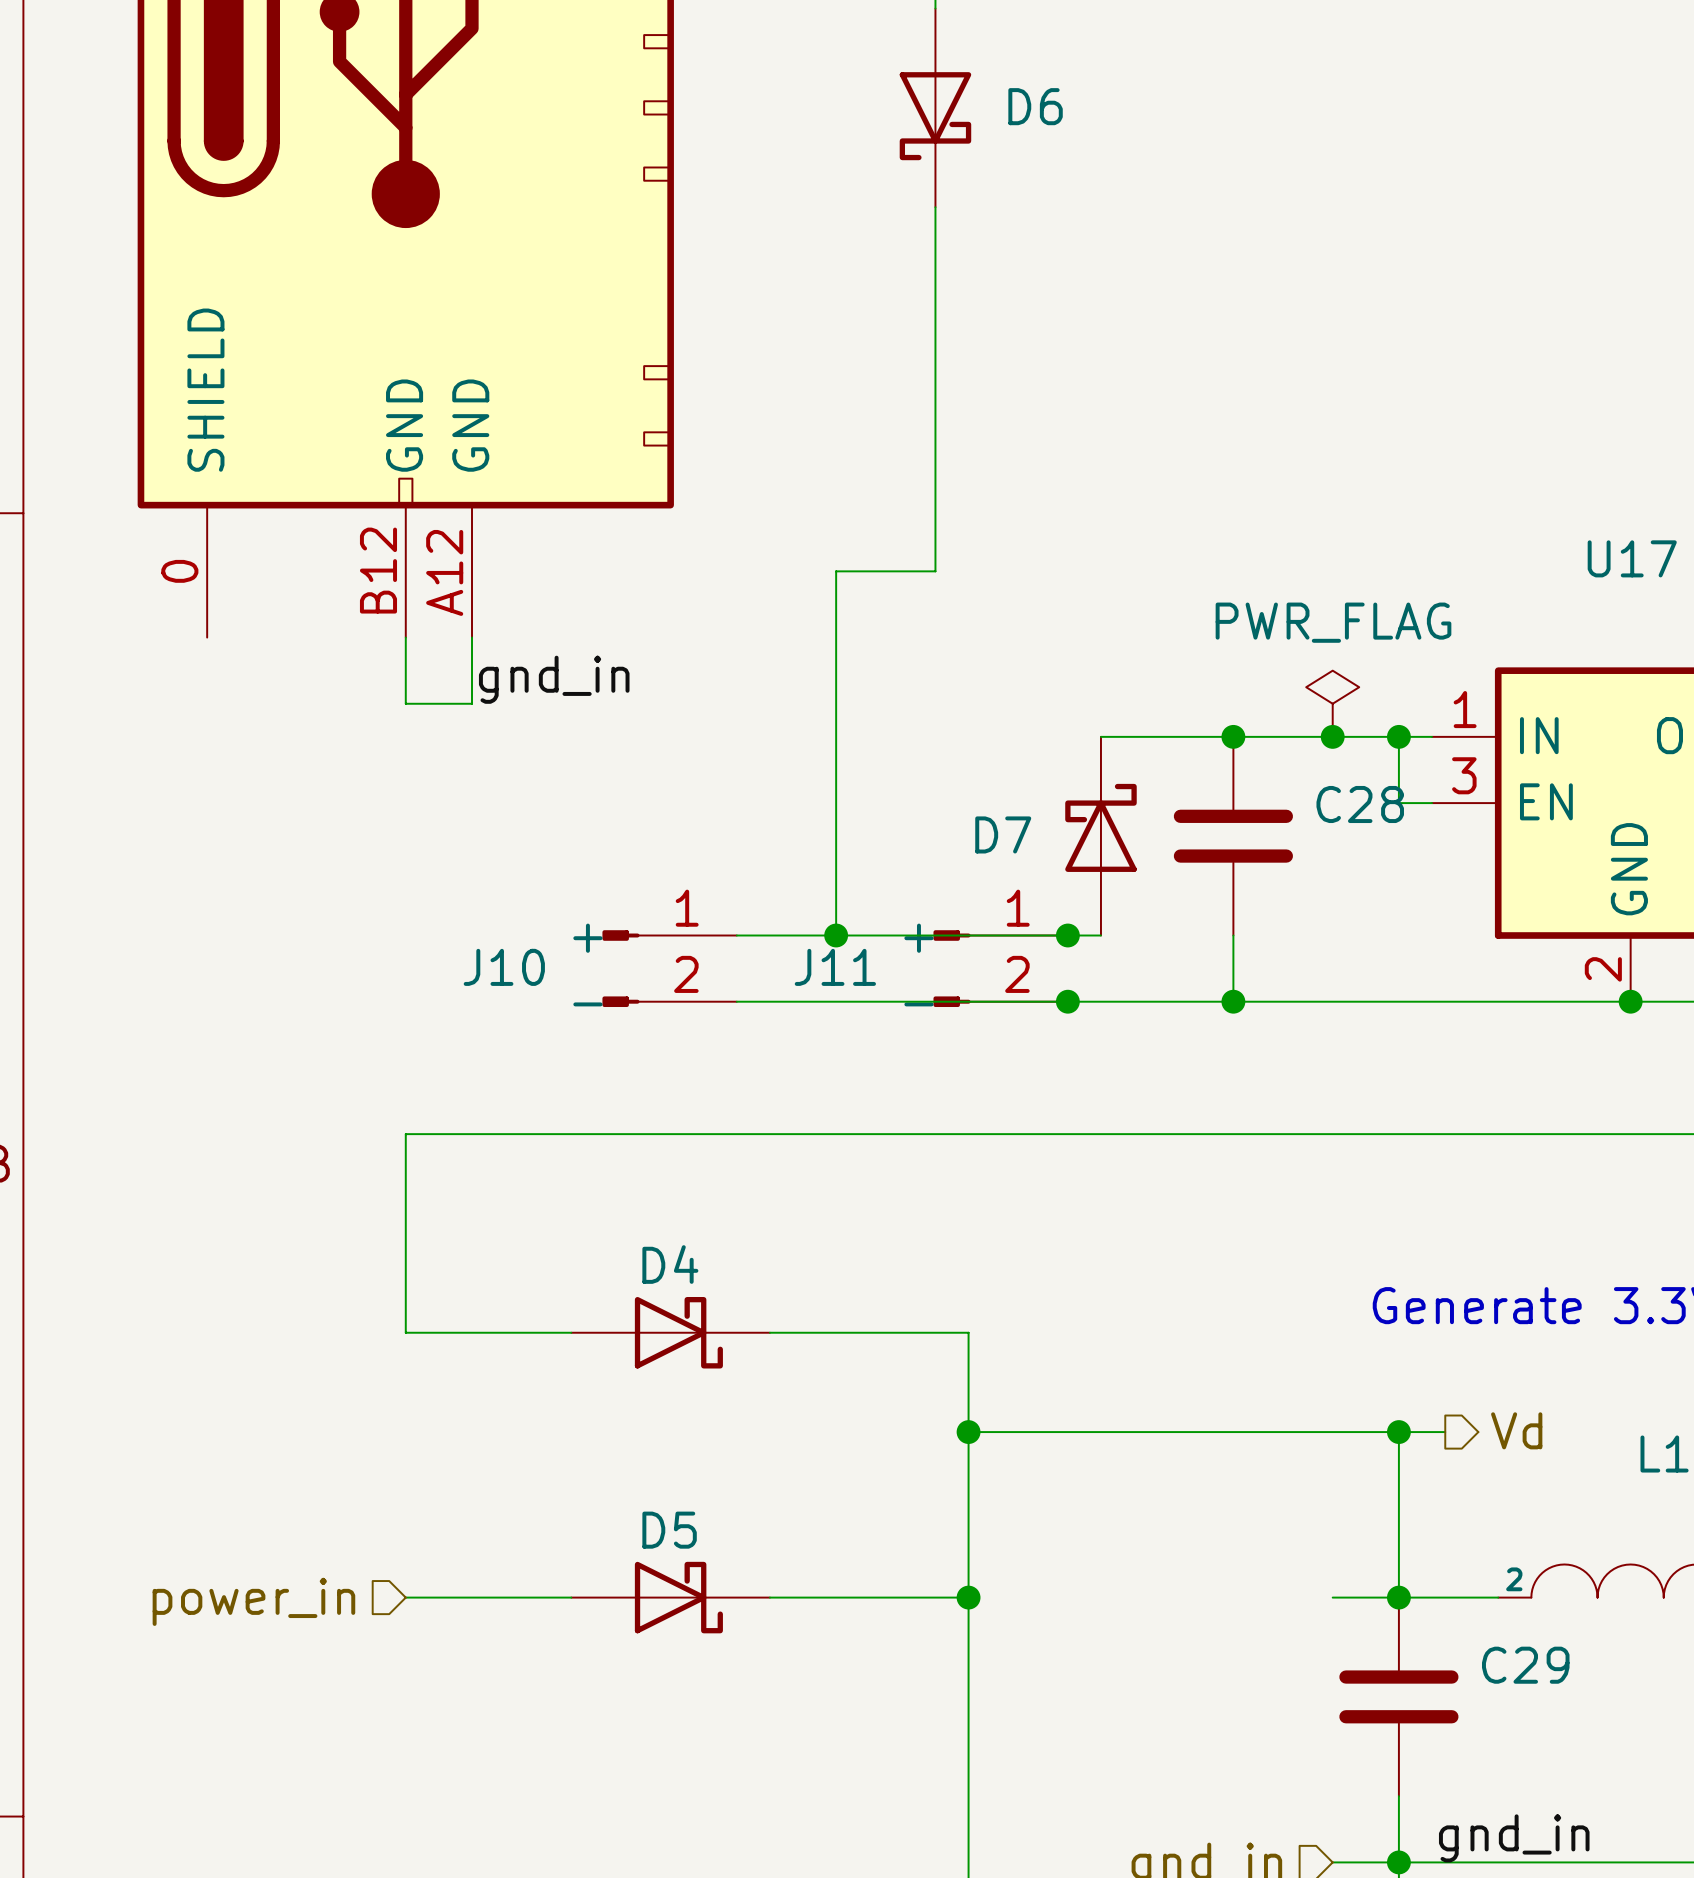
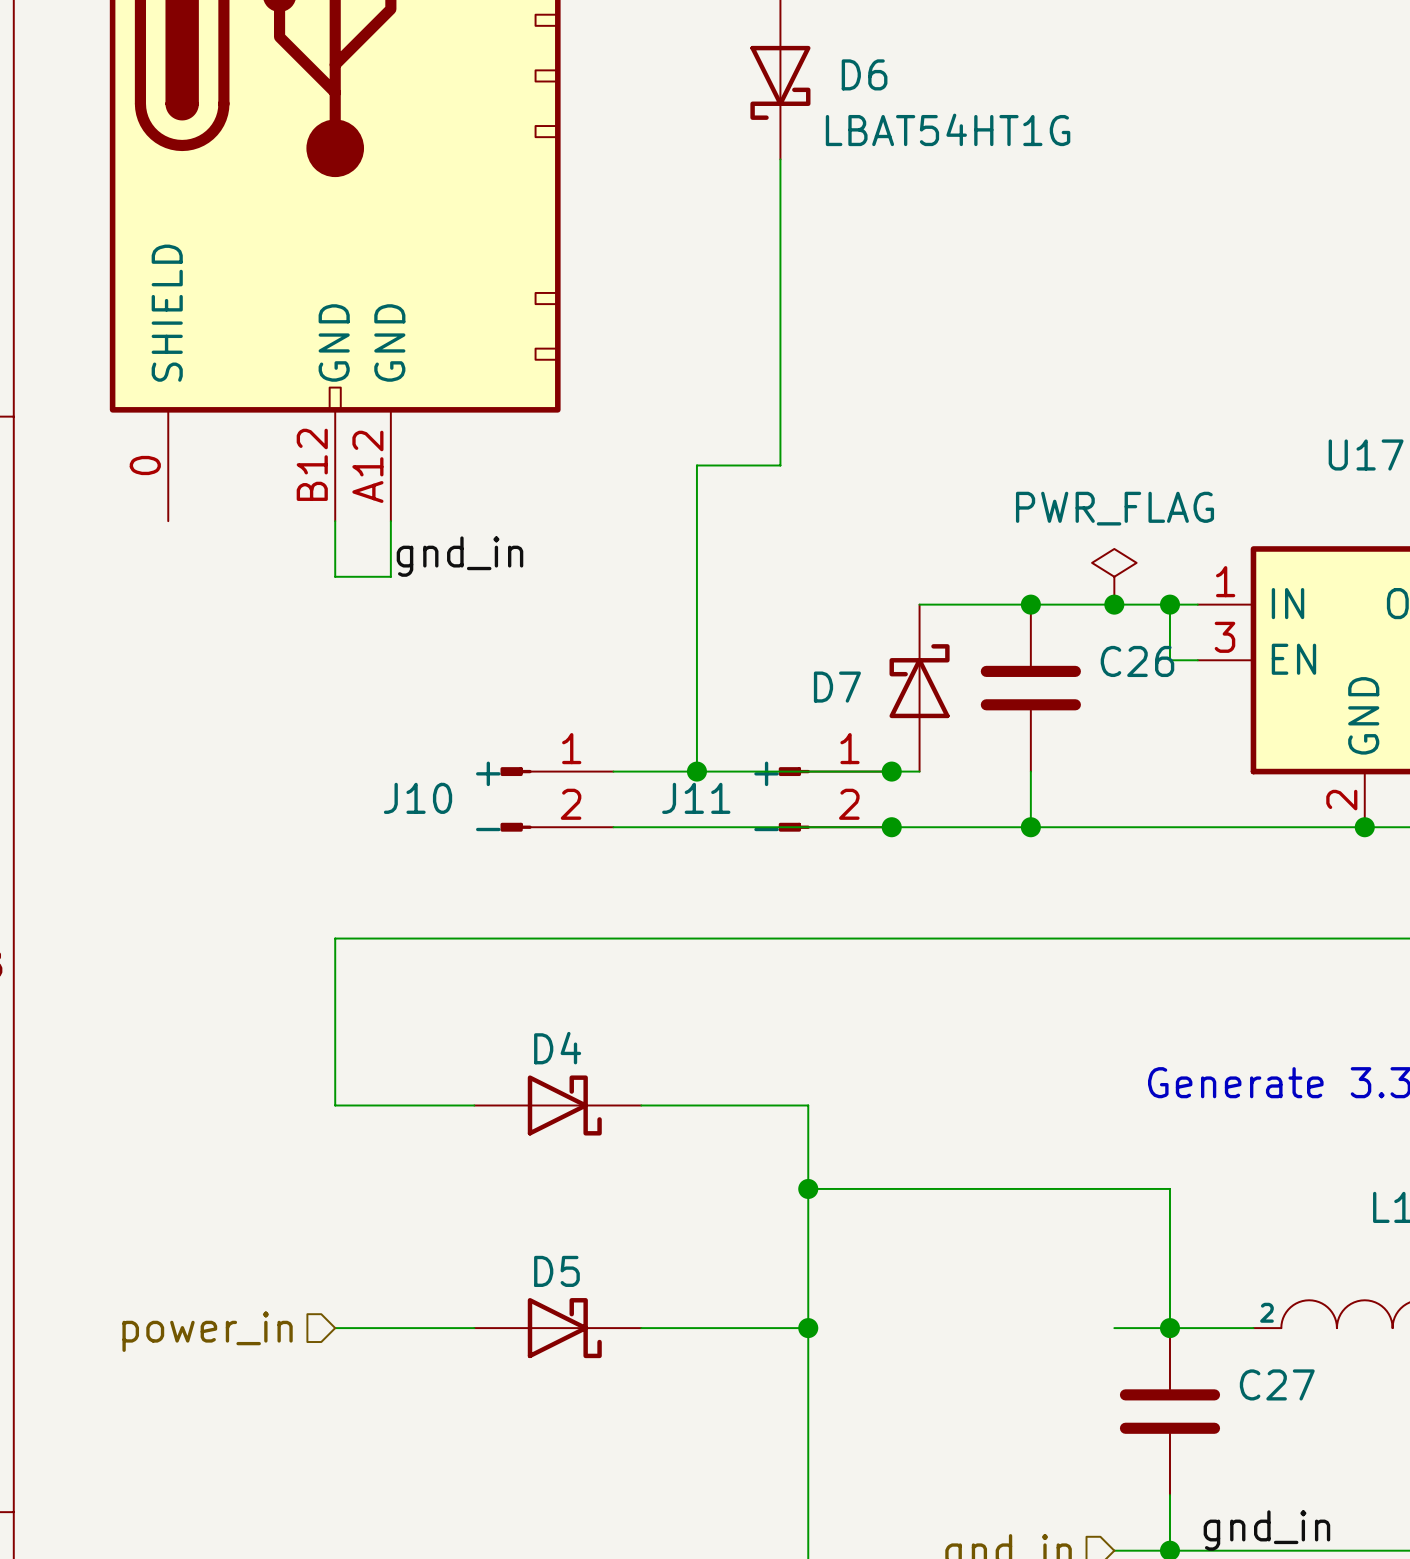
D6 value: none -> LBAT54HT1G (948, 129)
C28 name: C28 (1360, 804) -> C26 (1137, 661)
hierarchical label: Vd (1516, 1430) -> none
wire: (1398, 1432) (1445, 1432) -> none
junction: (1398, 1432) -> none
C29 name: C29 (1525, 1665) -> C27 (1277, 1384)

